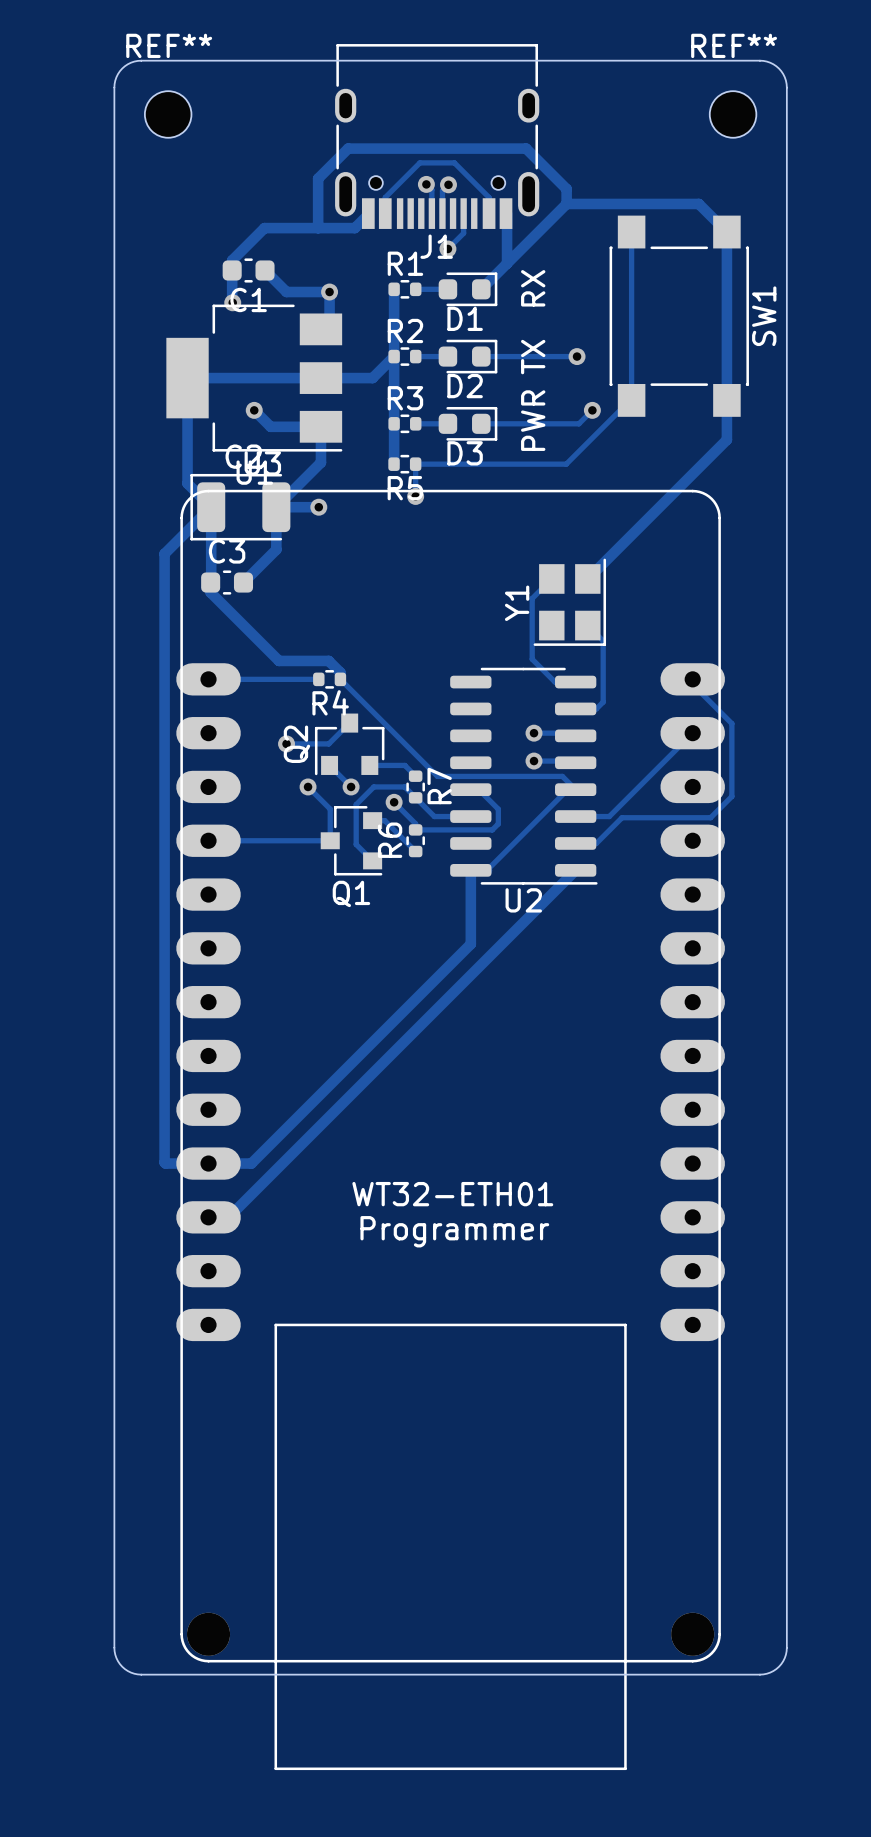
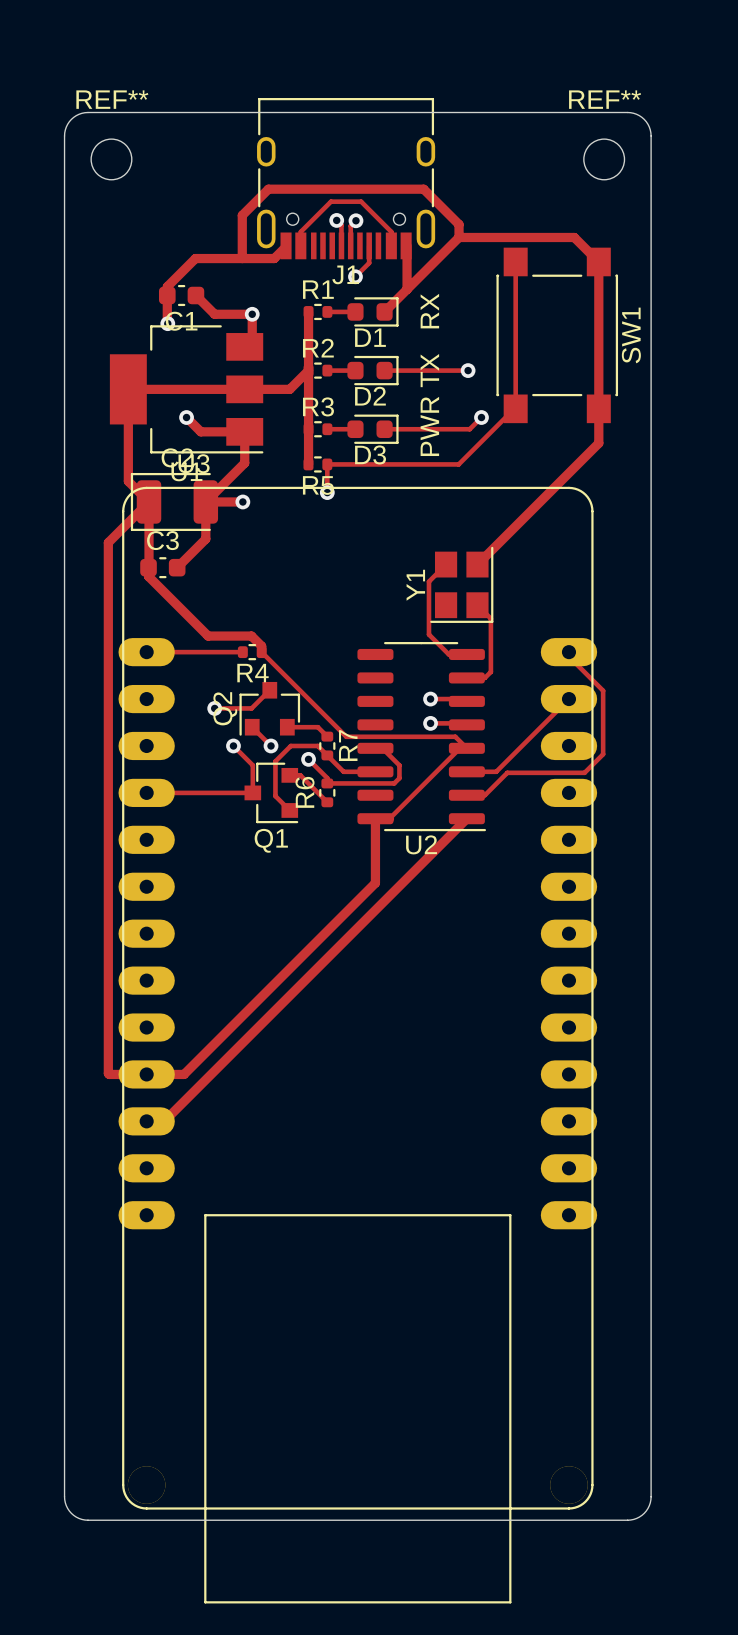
text: WT32-ETH01 (452, 1194) -> none
text: Programmer (454, 1231) -> none

